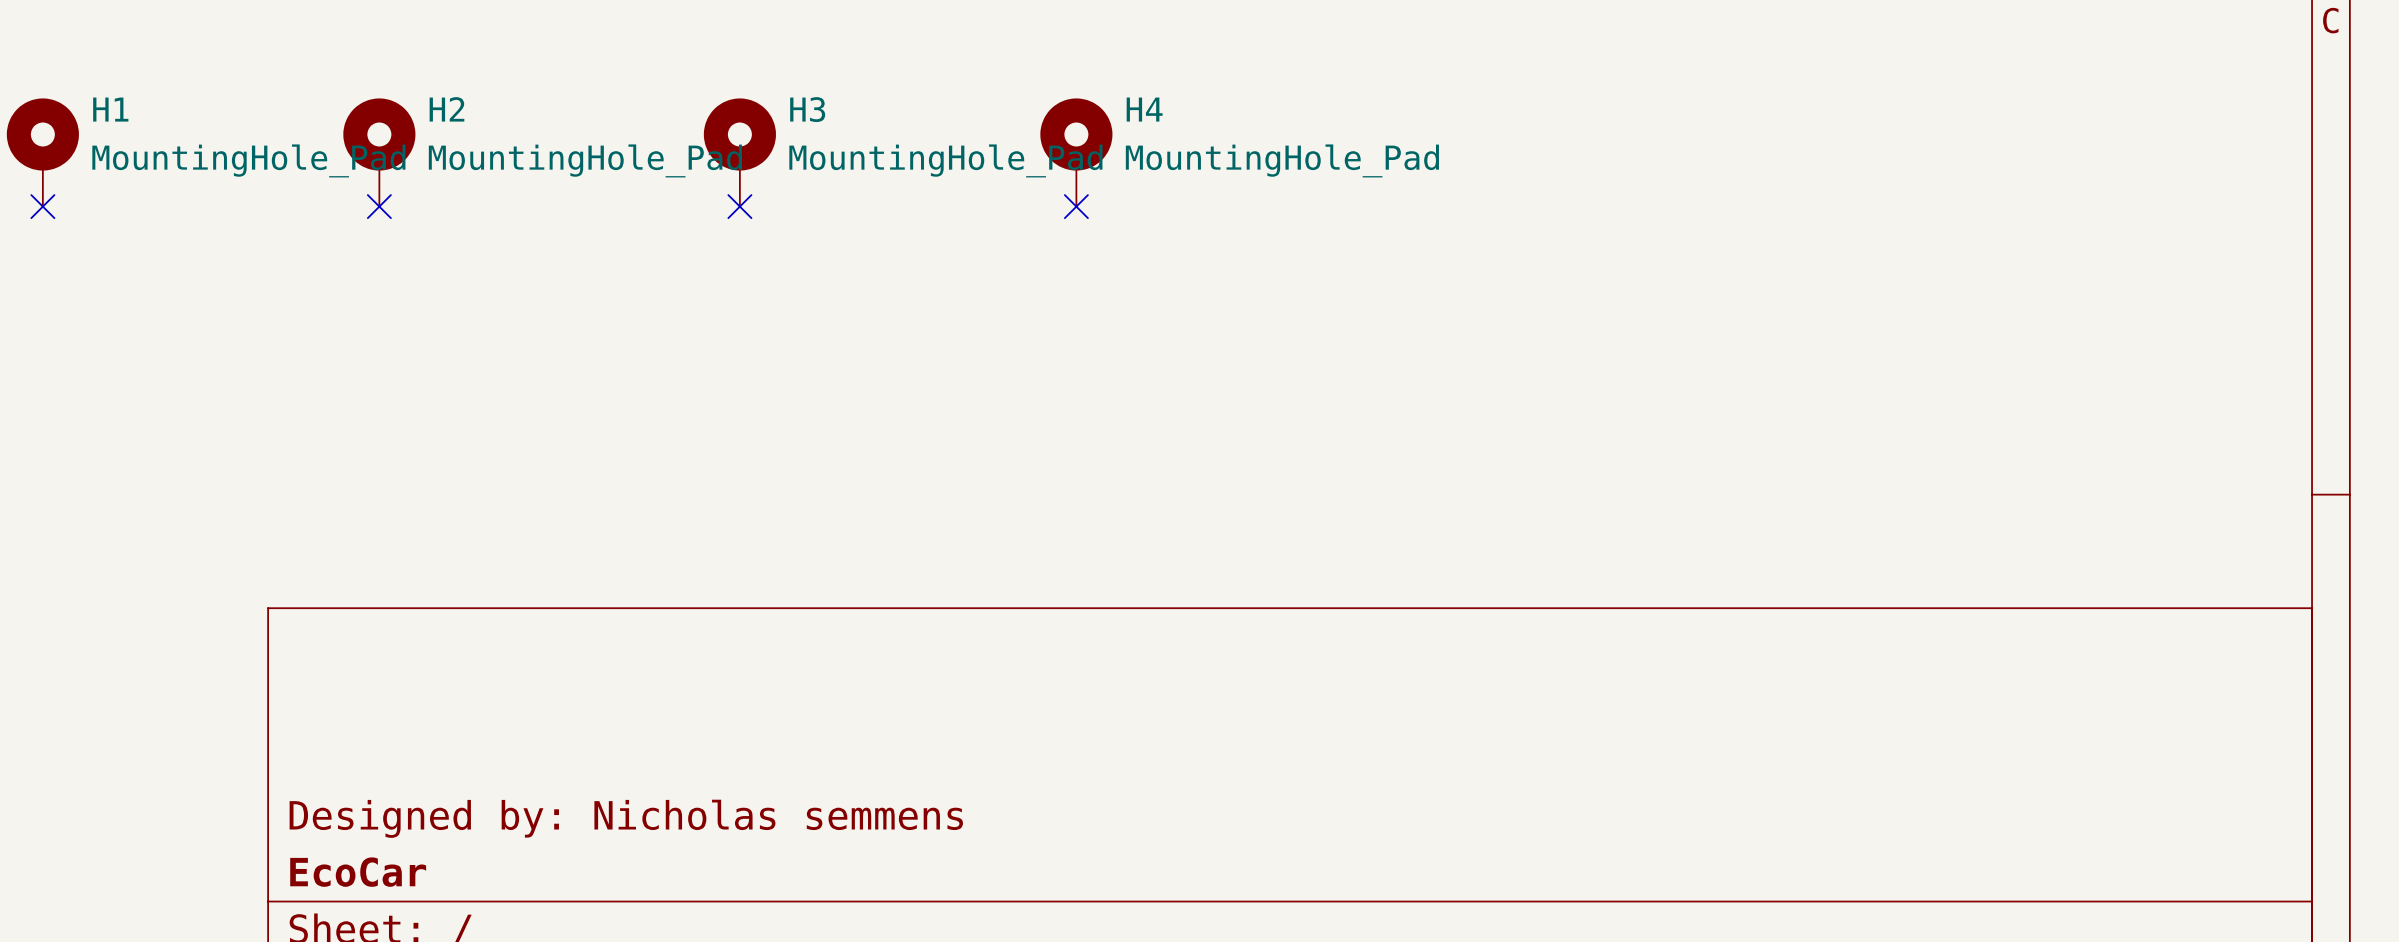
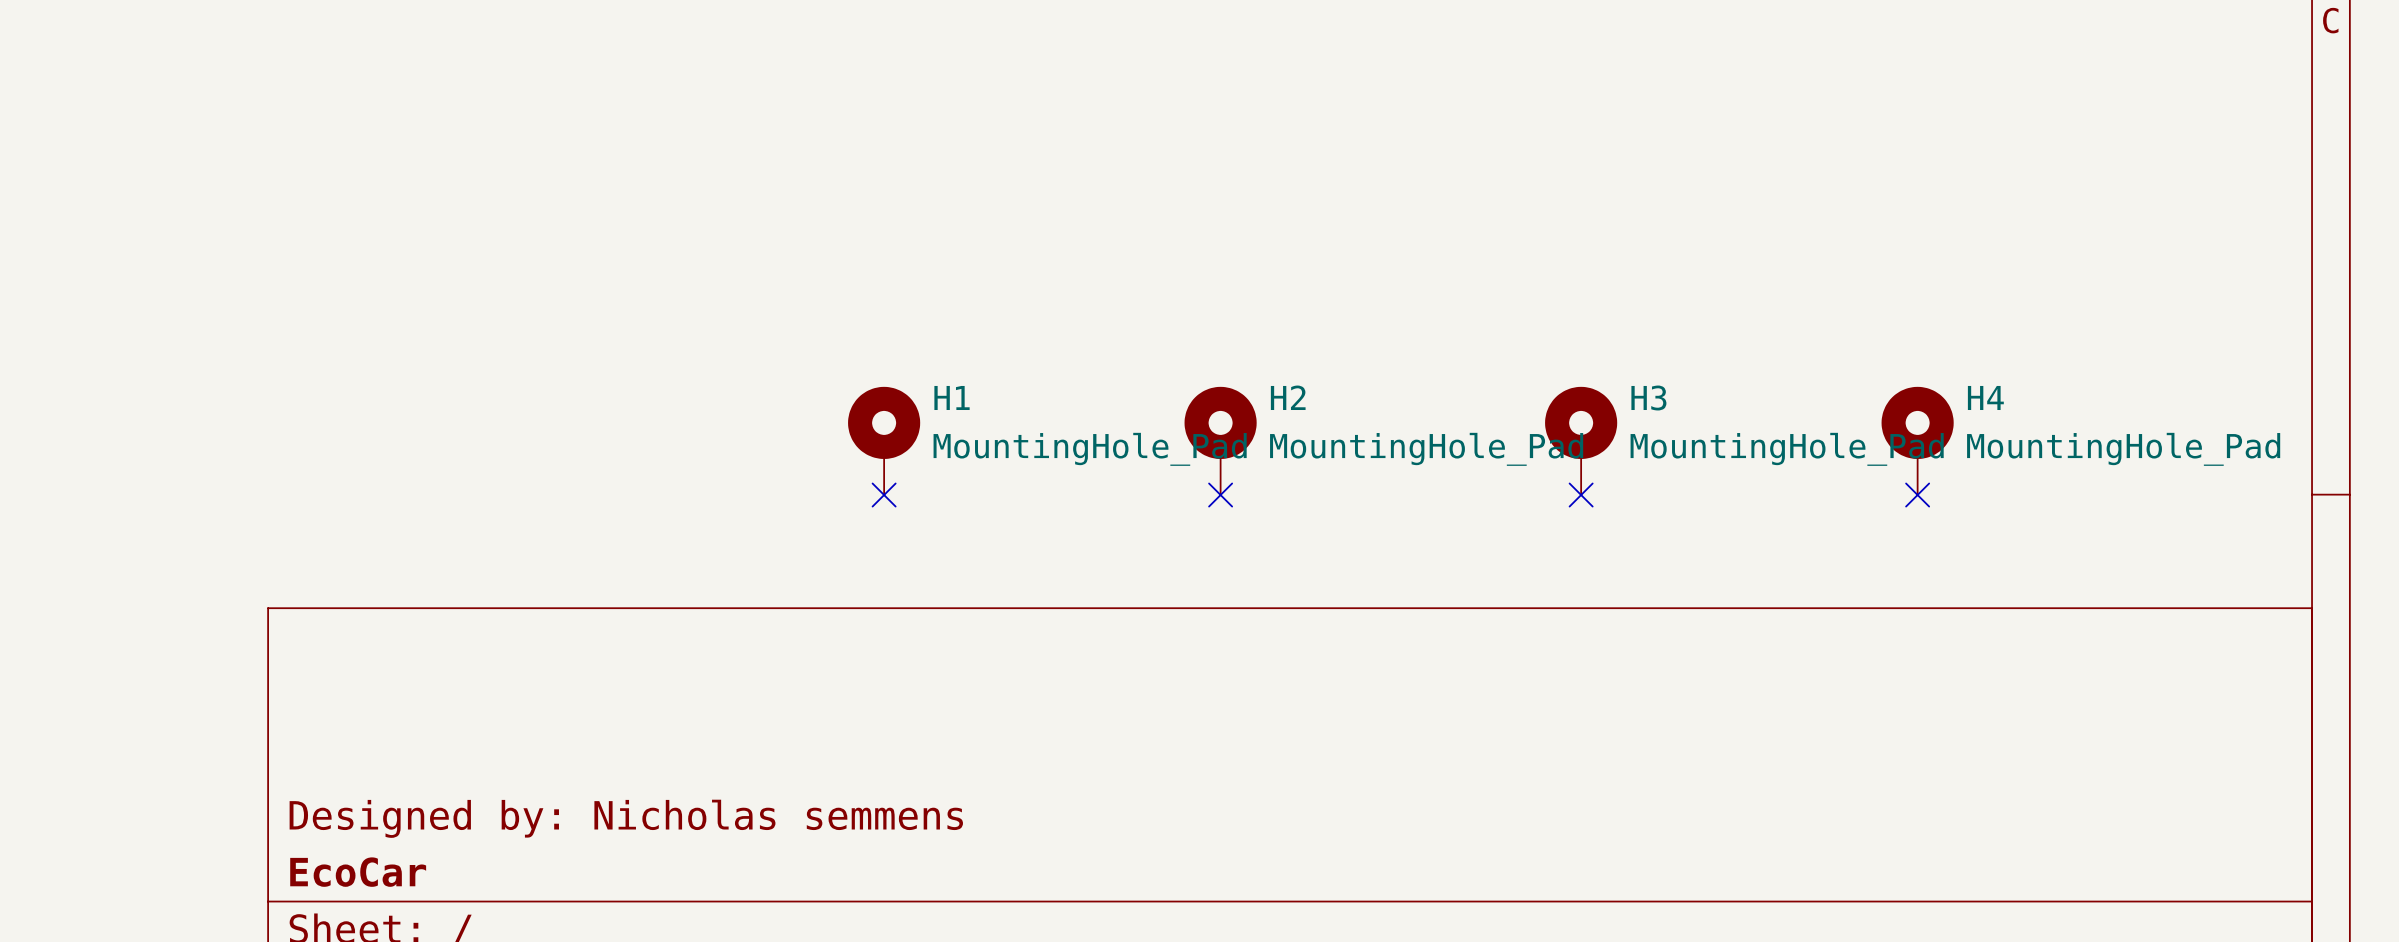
H1 position: (42, 152) -> (884, 440)
H2 position: (379, 152) -> (1220, 440)
H3 position: (739, 152) -> (1581, 440)
H4 position: (1076, 152) -> (1917, 440)
no-connect mark: (42, 206) -> none
no-connect mark: (379, 206) -> none
no-connect mark: (739, 206) -> none
no-connect mark: (1076, 206) -> none
no-connect mark: none -> (884, 495)
no-connect mark: none -> (1220, 495)
no-connect mark: none -> (1581, 495)
no-connect mark: none -> (1917, 495)

